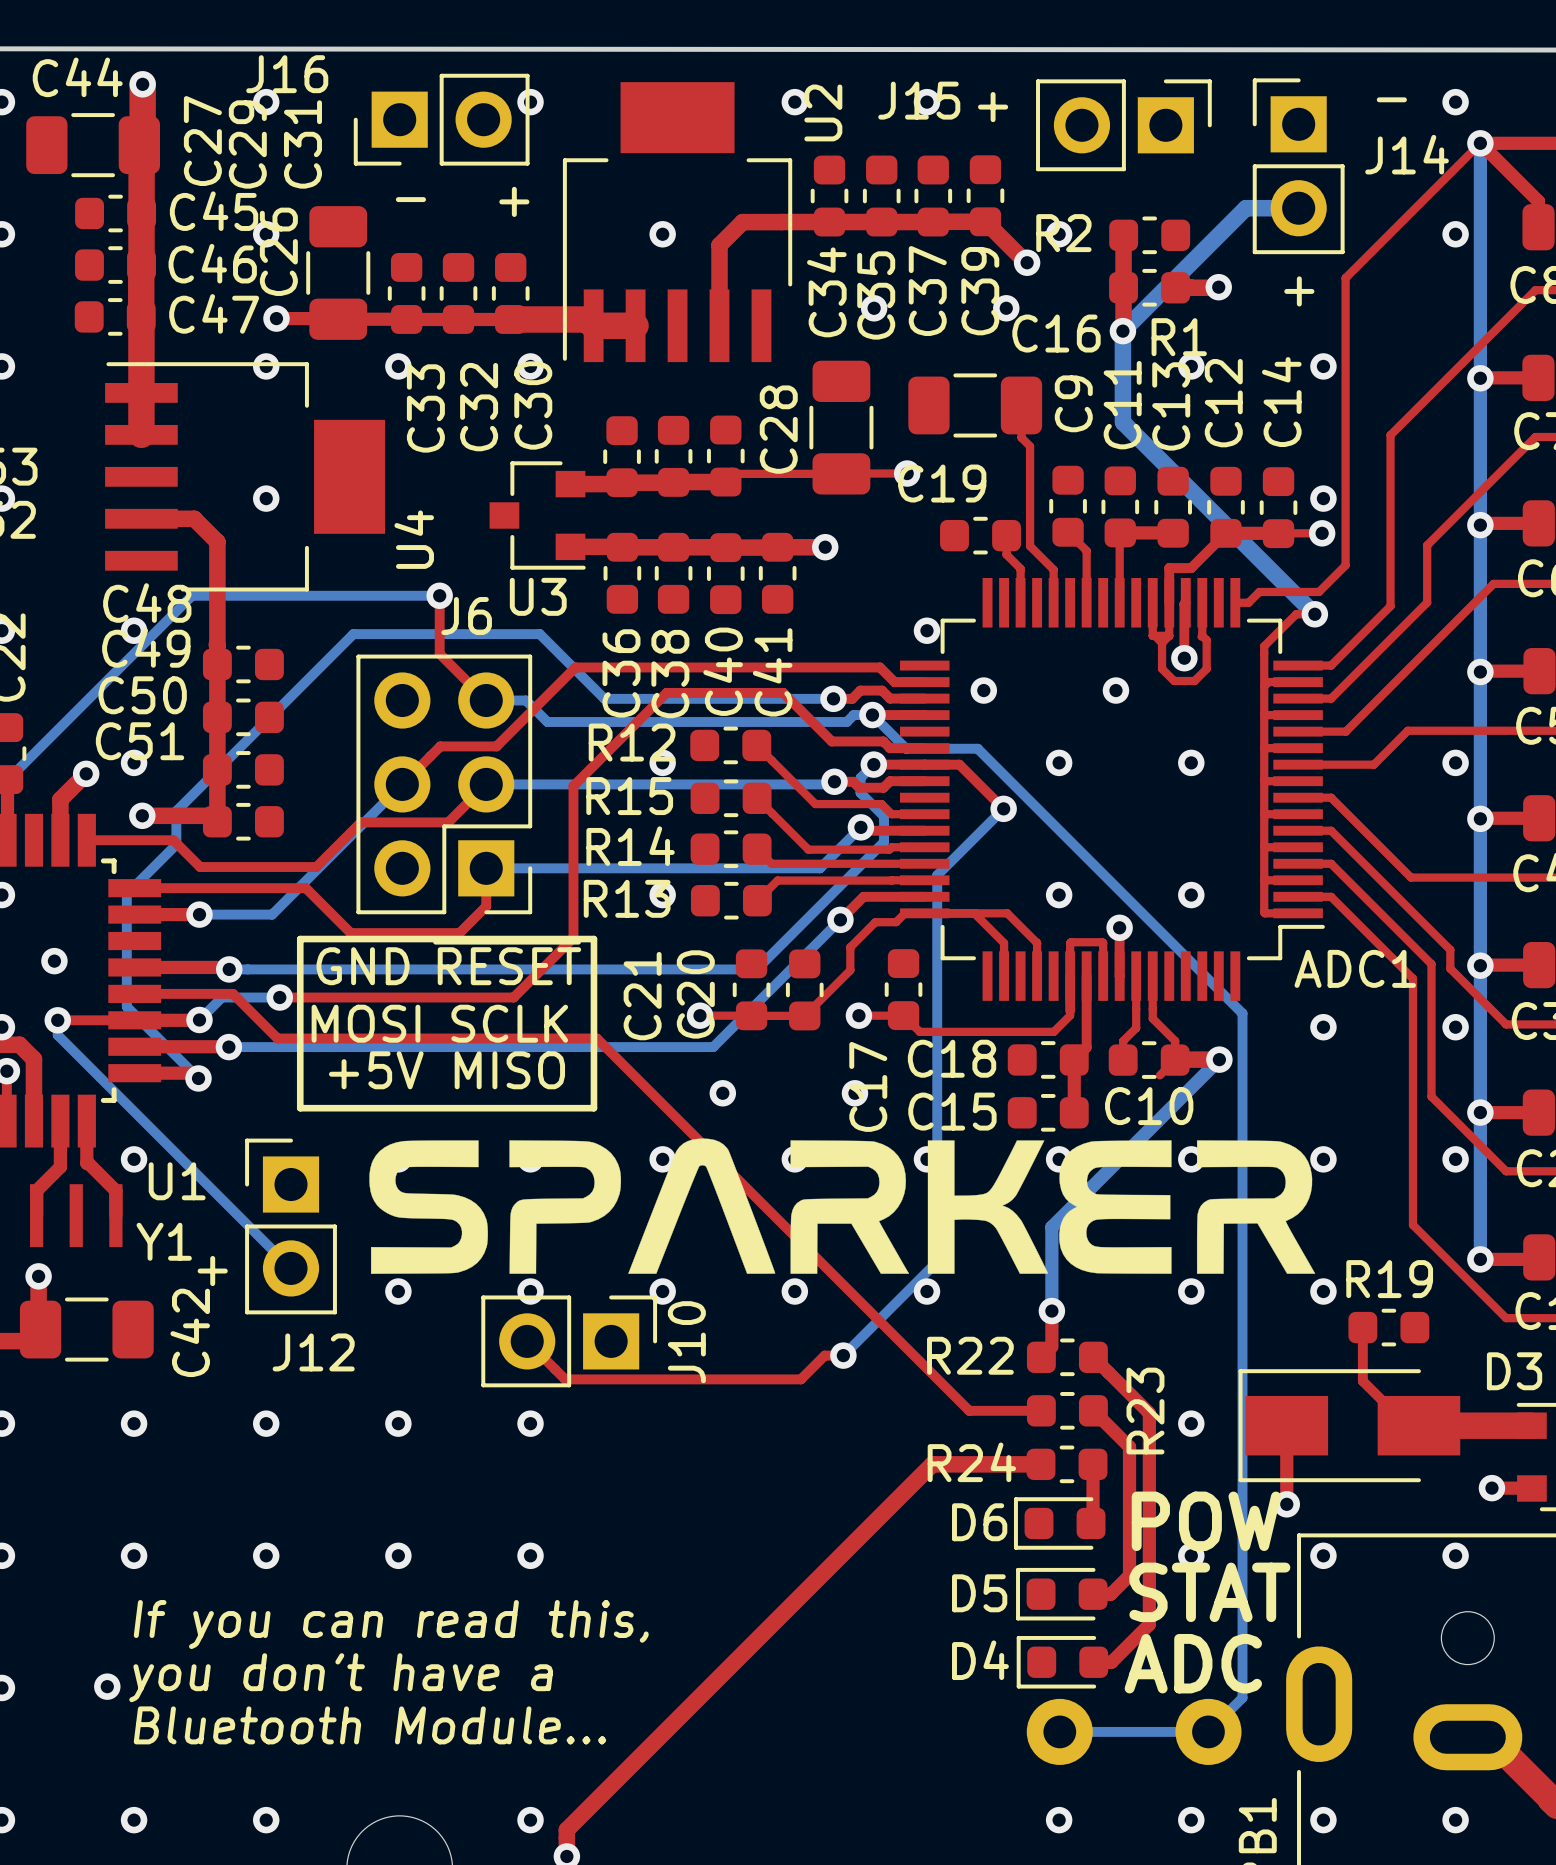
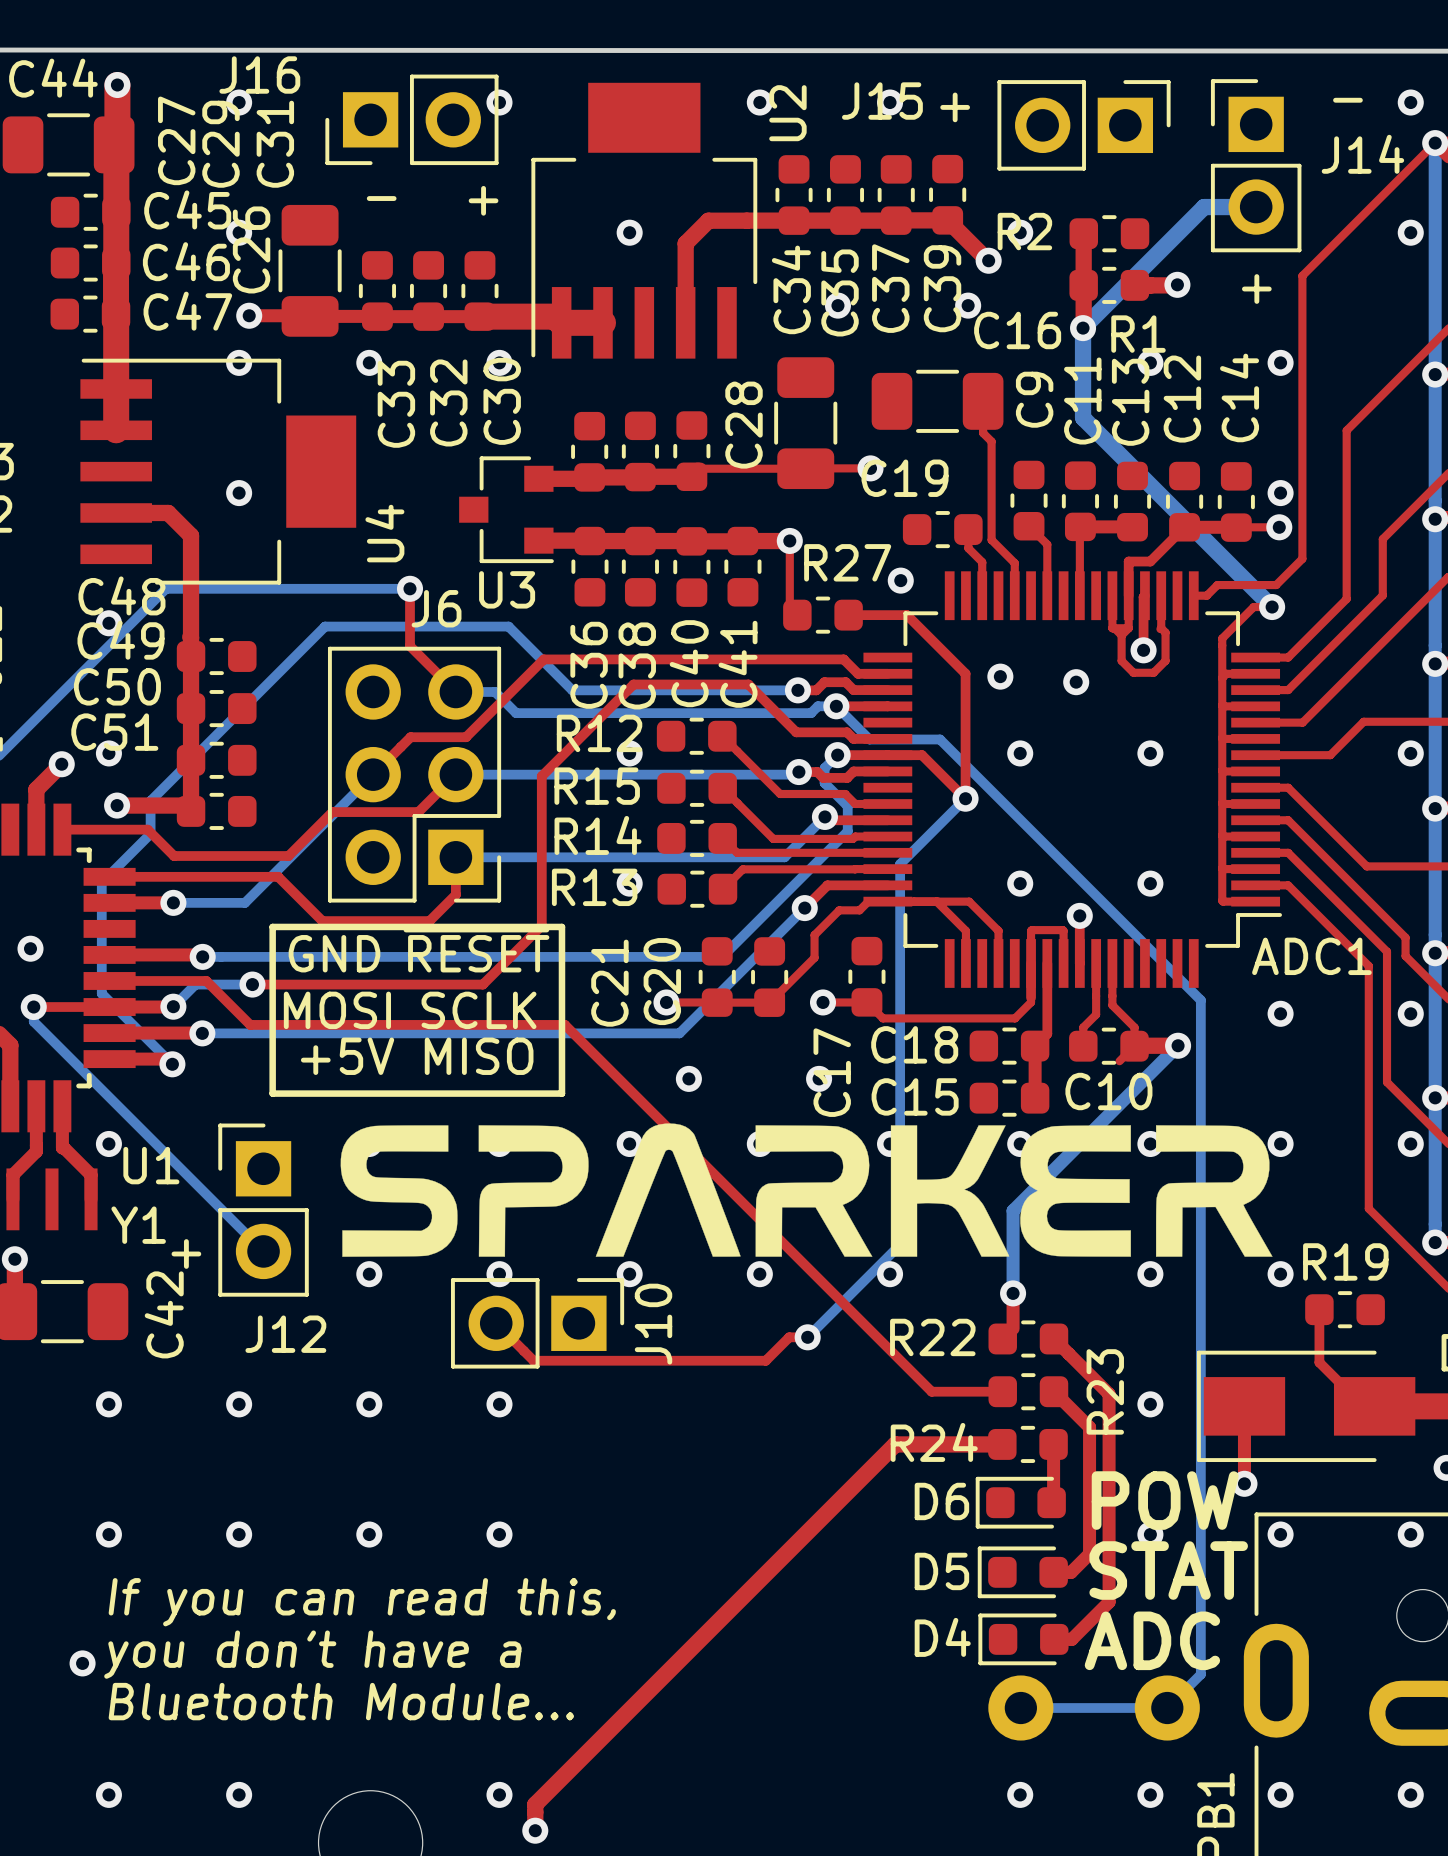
top track: none -> (789, 540) (789, 607) (797, 615)
R27: none -> (822, 615)
top track: none -> (848, 615) (906, 615) (965, 673) (965, 798)
via position: (926, 630) -> (900, 580)
via position: (983, 690) -> (1000, 676)

